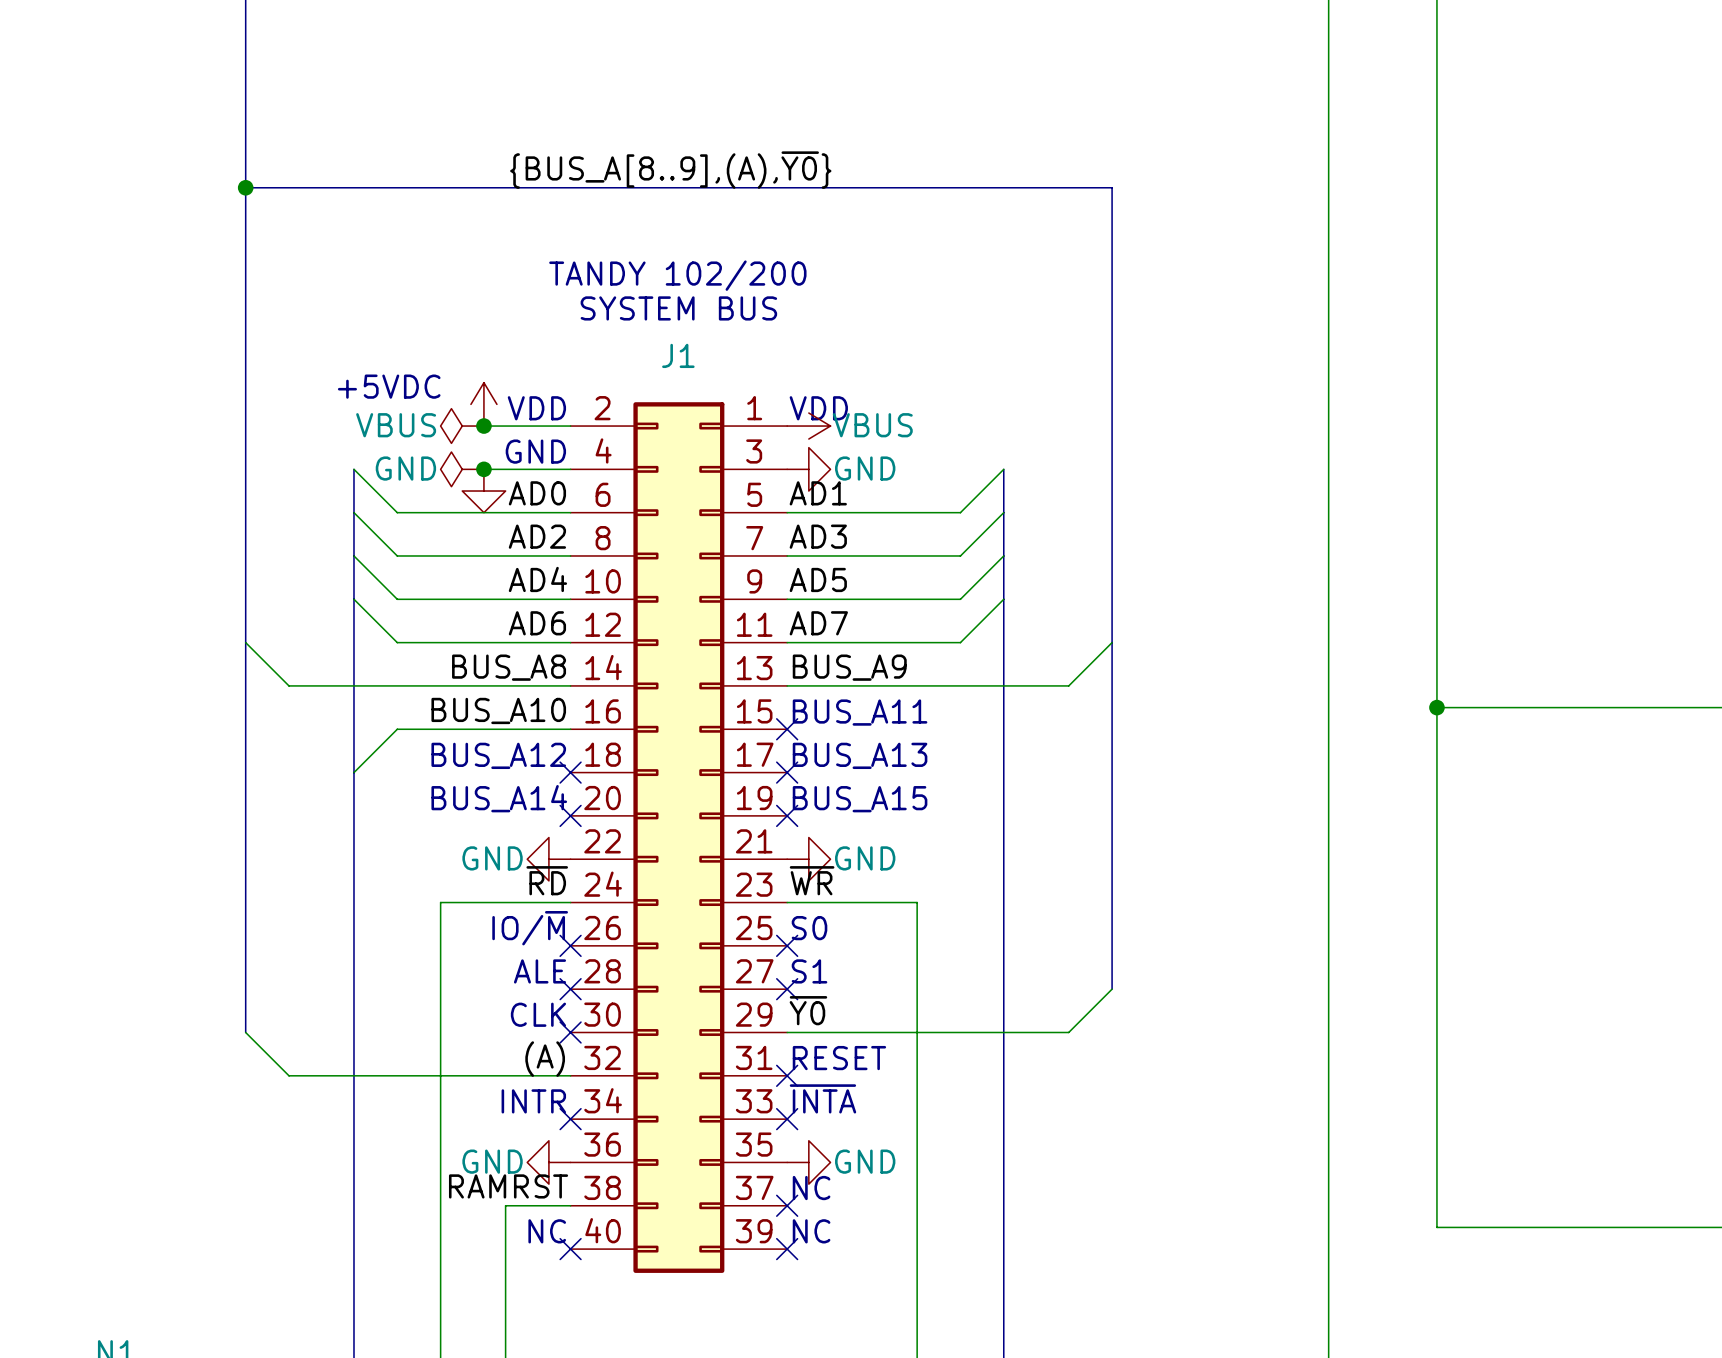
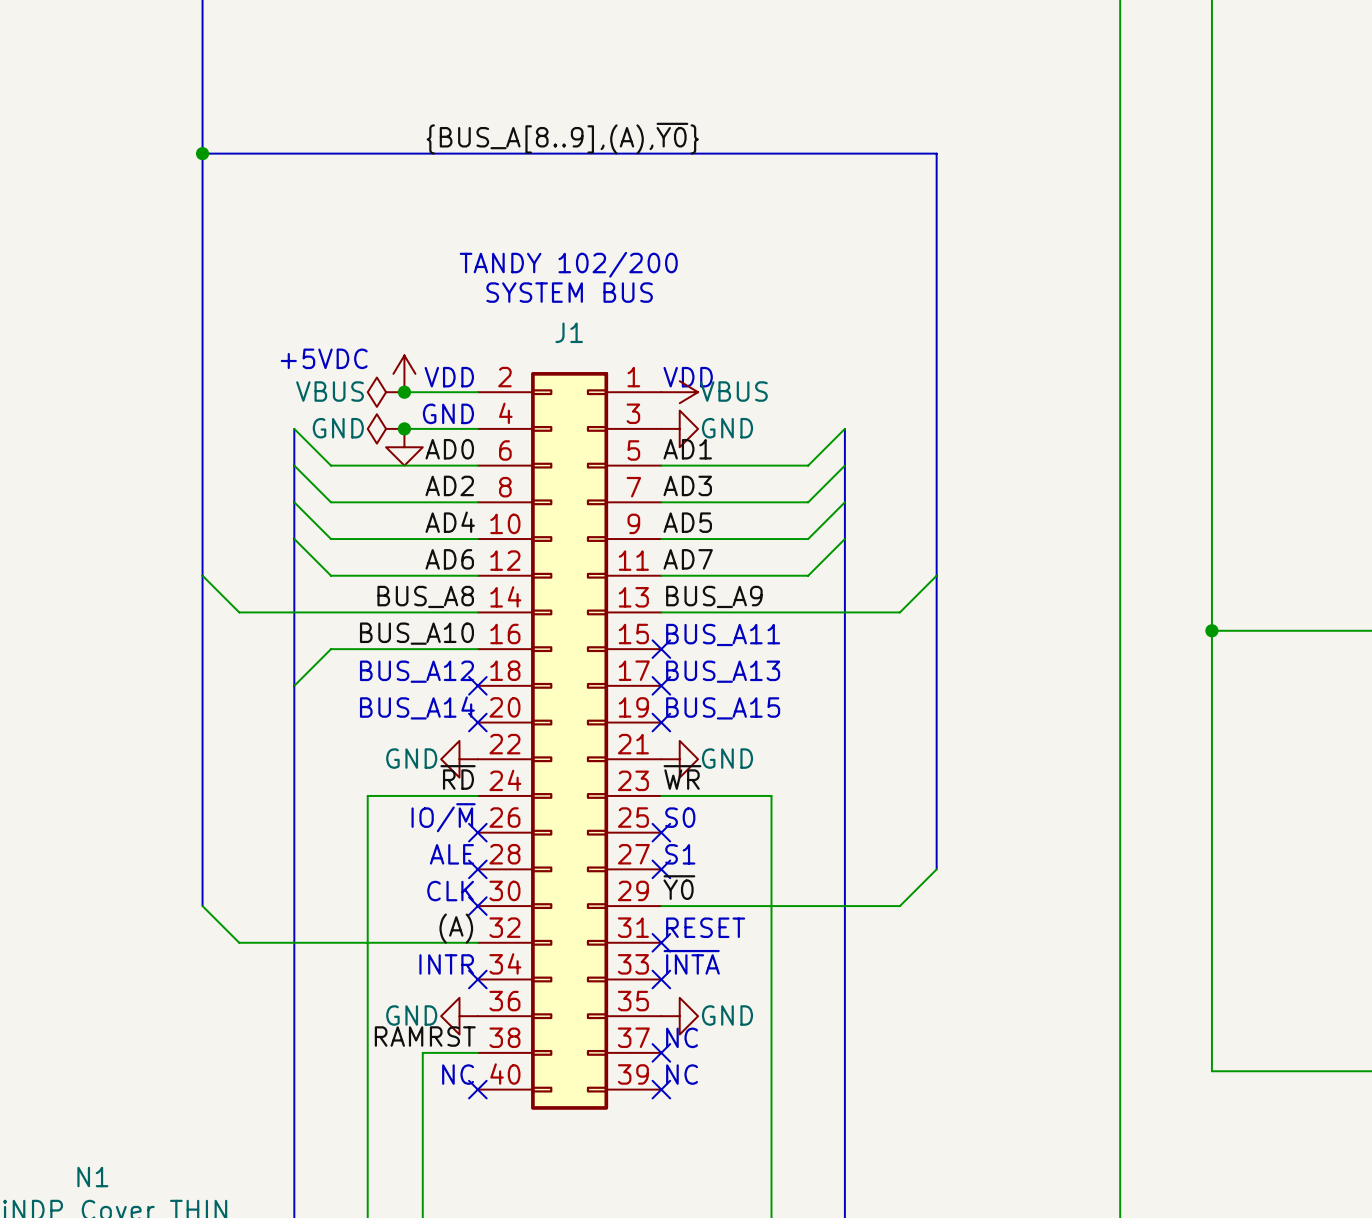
label position: {BUS_A[8..9],(A),~{Y0}} (670, 170) -> {BUS_A[8..9],(A),~{Y0}} (562, 138)
bus: (245, 187) (1112, 187) -> (202, 153) (936, 153) (936, 190)
junction position: (245, 187) -> (202, 153)

